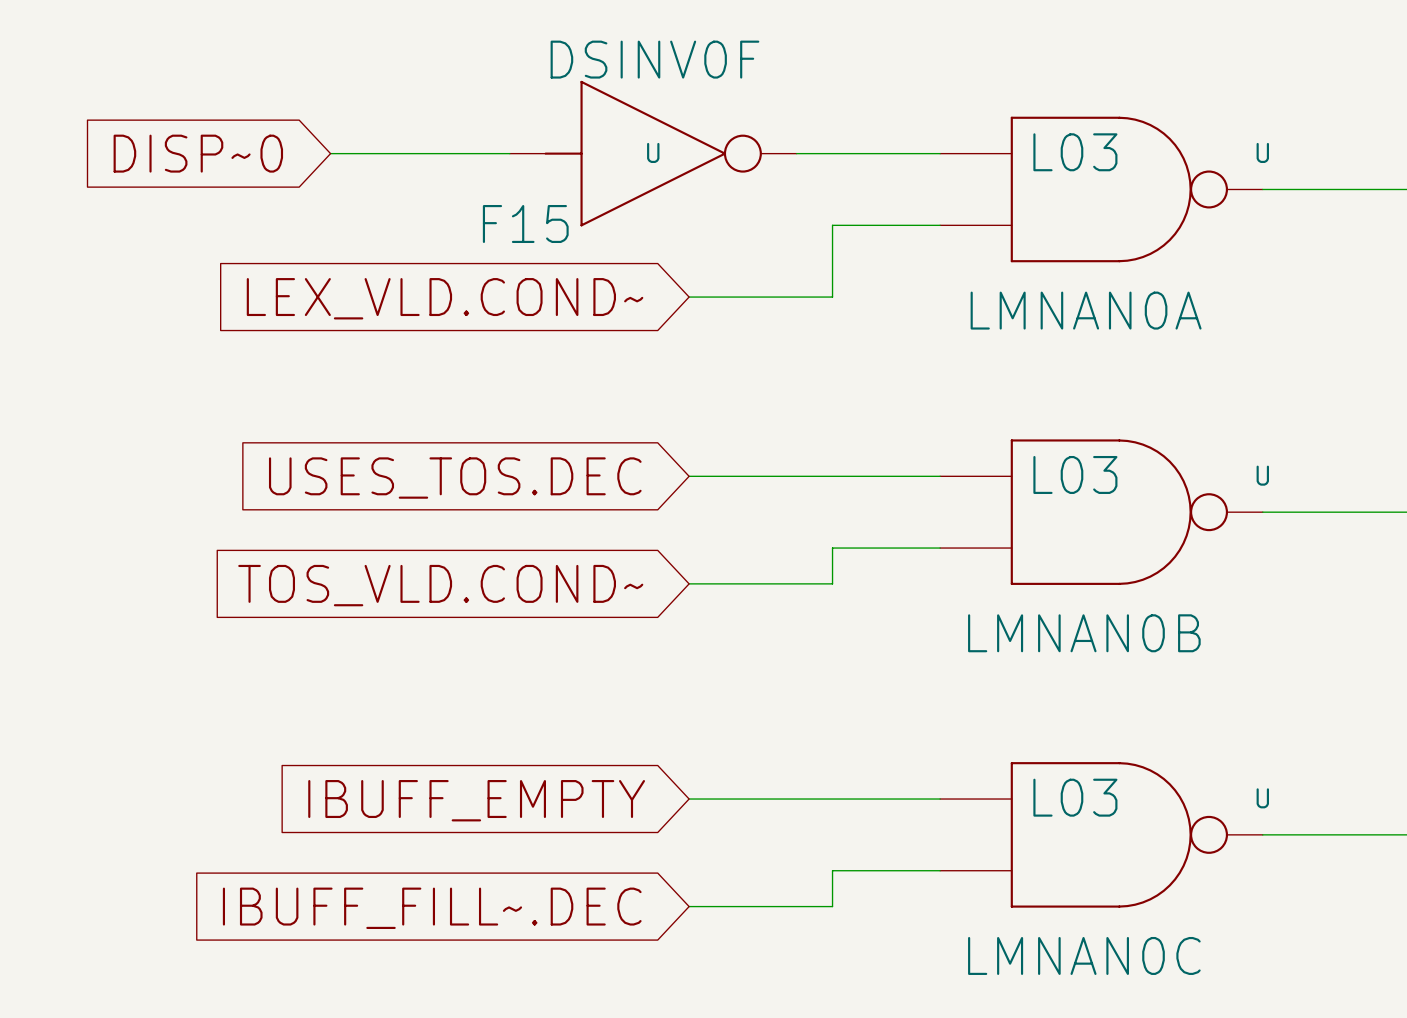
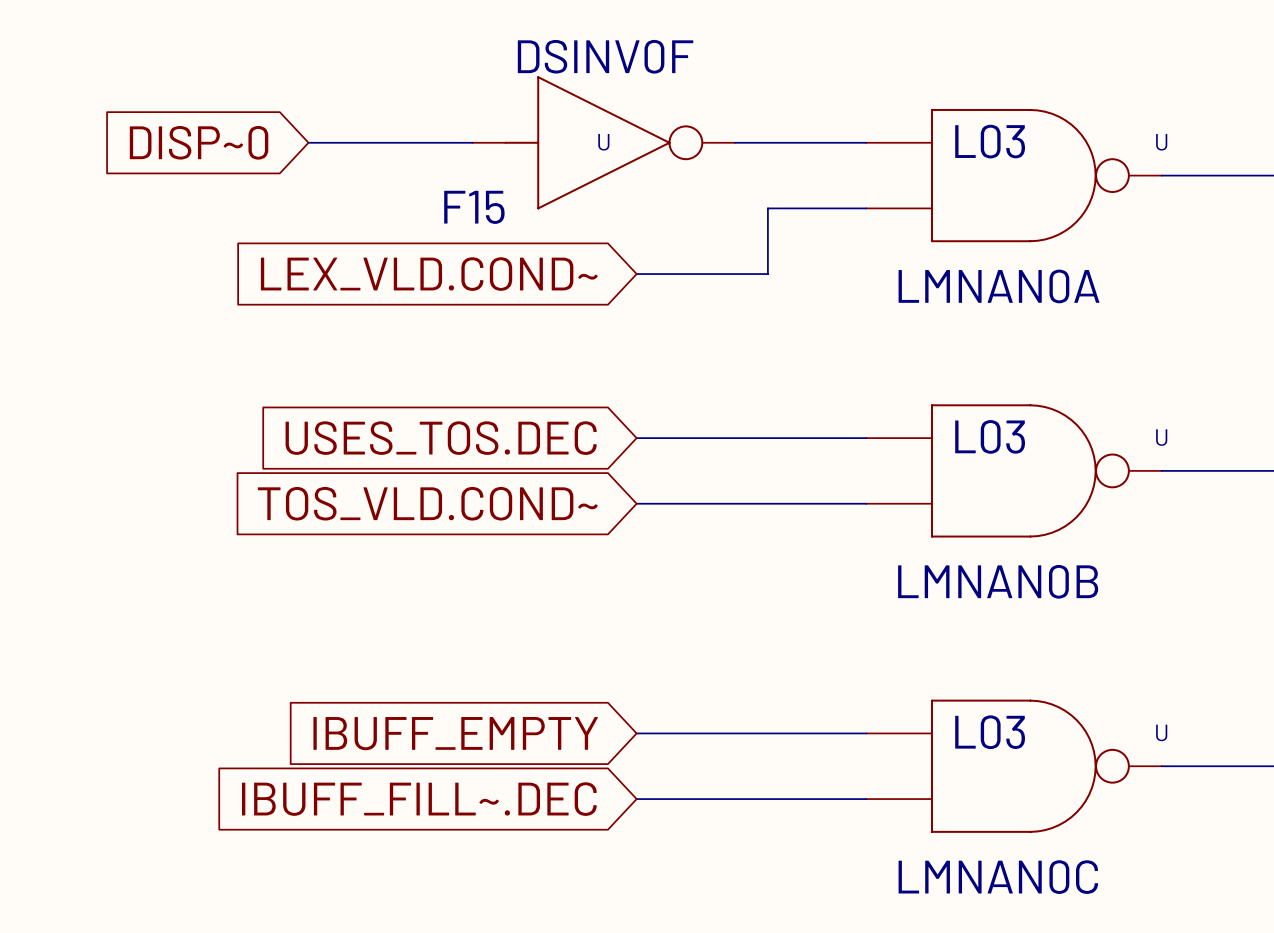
wire: (832, 548) (832, 583) (689, 583) -> (767, 503) (636, 503)
global label position: TOS_VLD.COND~ (440, 585) -> TOS_VLD.COND~ (427, 503)
wire: (832, 870) (832, 906) (689, 906) -> (767, 799) (636, 799)
global label position: IBUFF_FILL~.DEC (432, 908) -> IBUFF_FILL~.DEC (419, 799)

